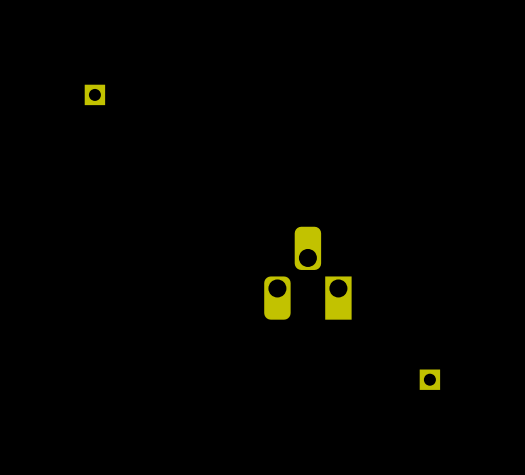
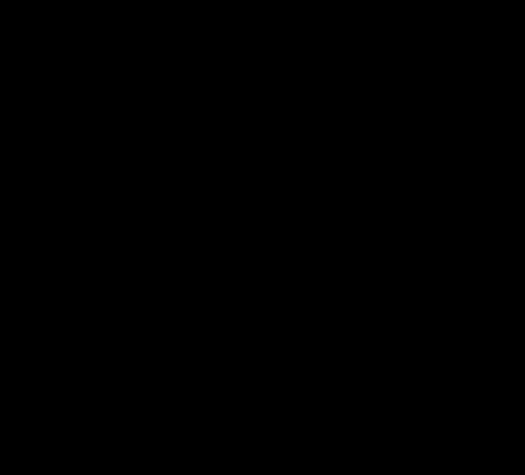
part: (94, 94) -> none
part: (307, 273) -> none
part: (429, 379) -> none

